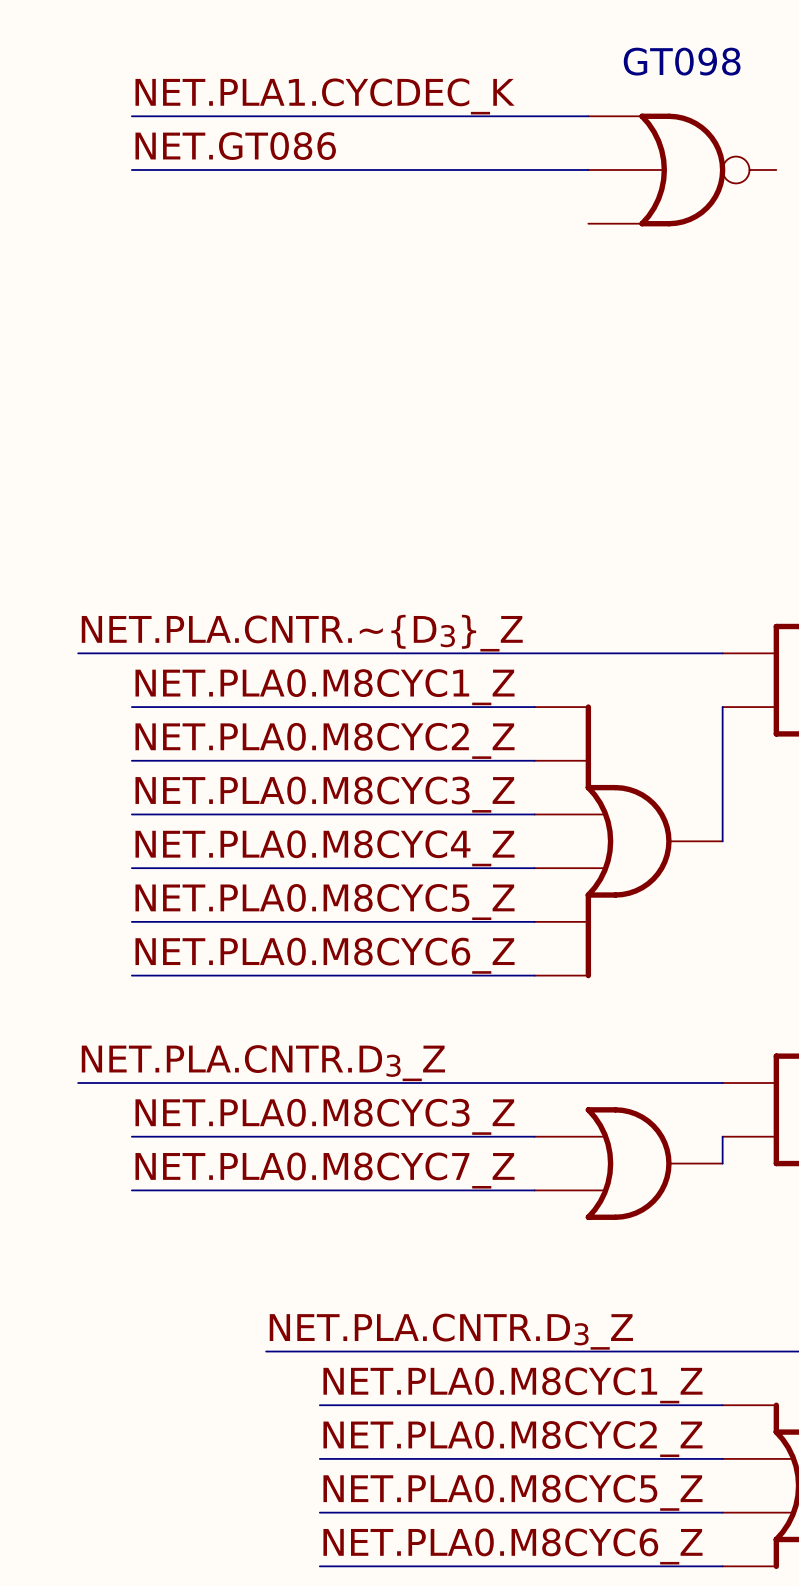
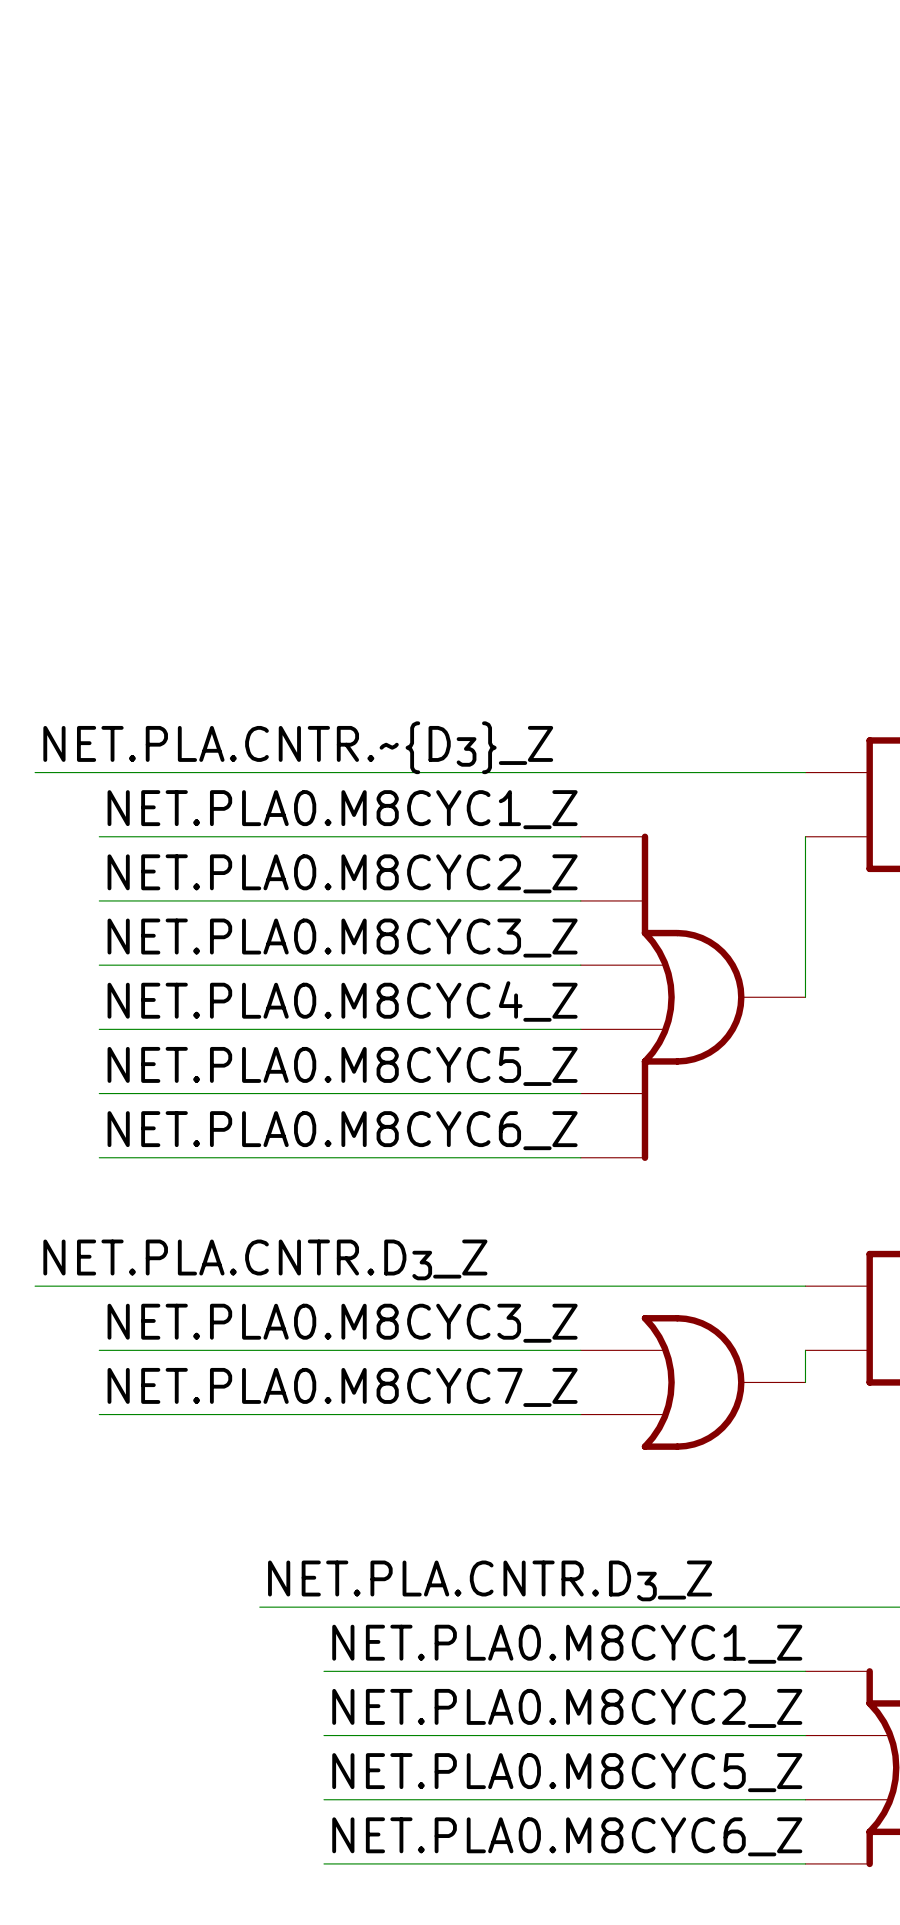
label: NET.PLA1.CYCDEC_K (325, 96) -> none
wire: (131, 116) (588, 116) -> none
label: NET.GT086 (235, 146) -> none
wire: (131, 170) (588, 170) -> none
part: GT098 (682, 170) -> none

